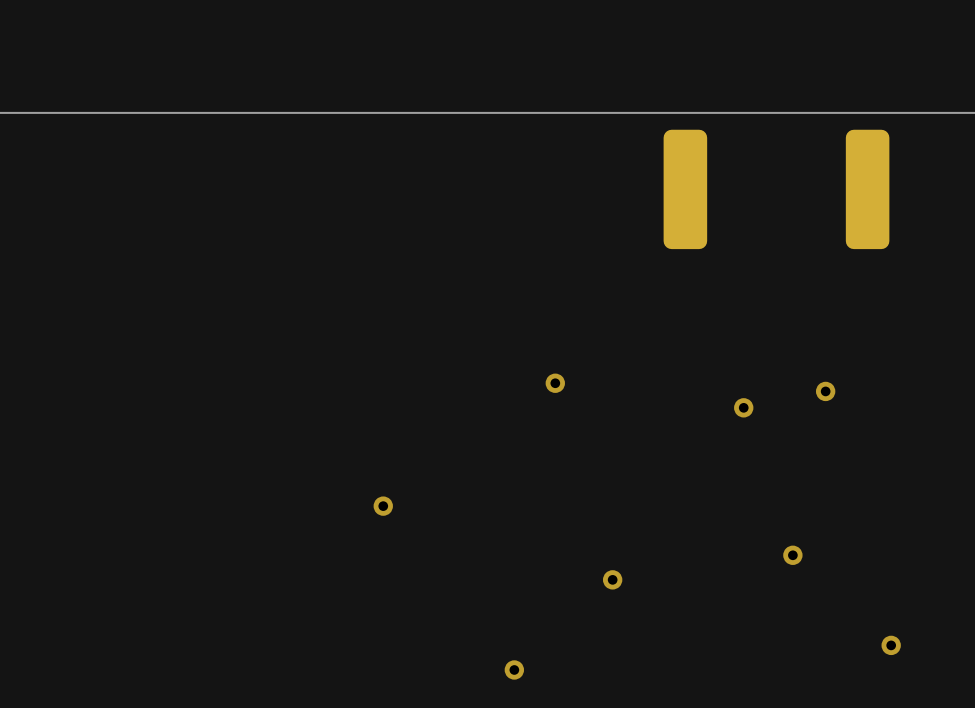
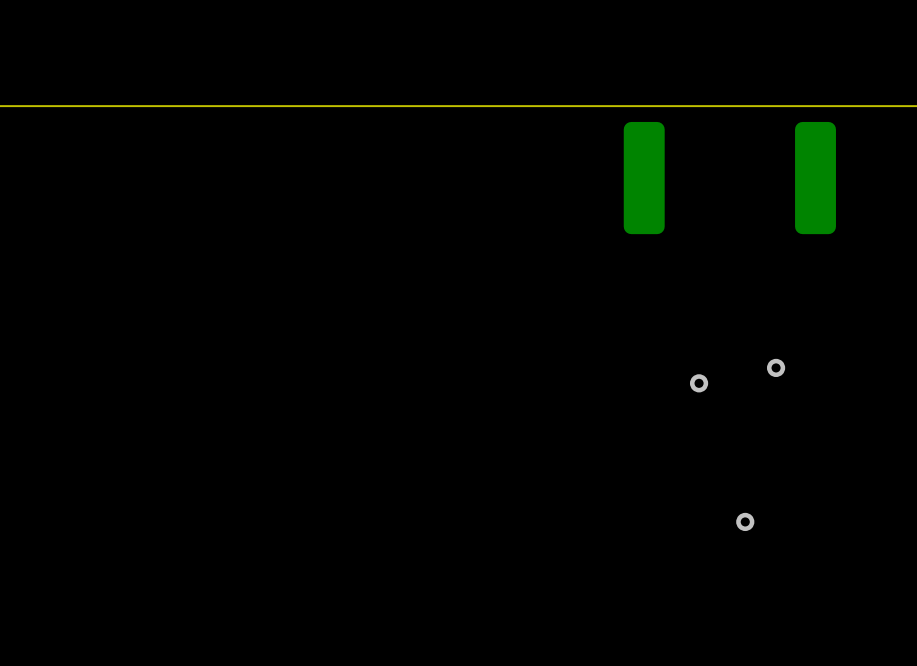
via: (555, 383) -> none
via: (383, 506) -> none
via: (612, 579) -> none
via: (891, 645) -> none
via: (514, 669) -> none

